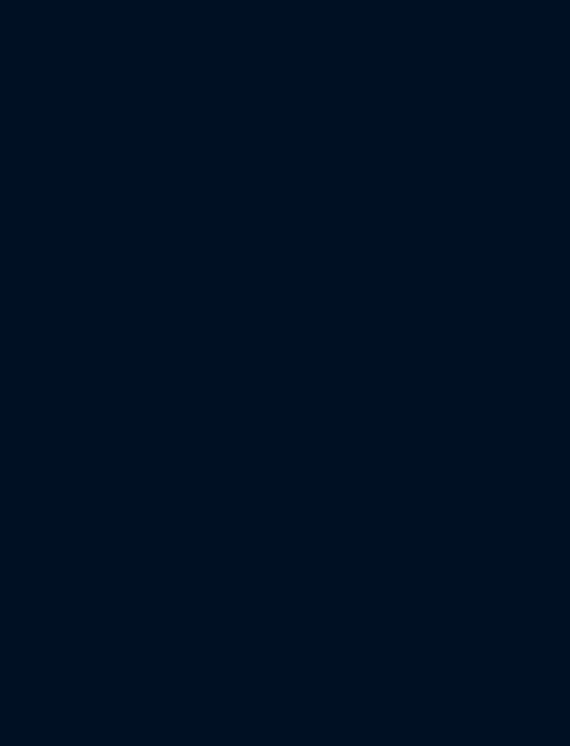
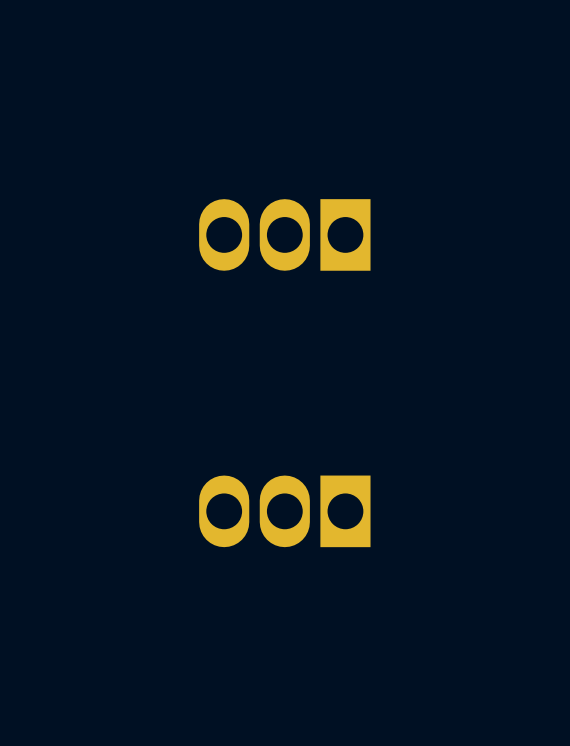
part: none -> (284, 234)
part: none -> (284, 511)

